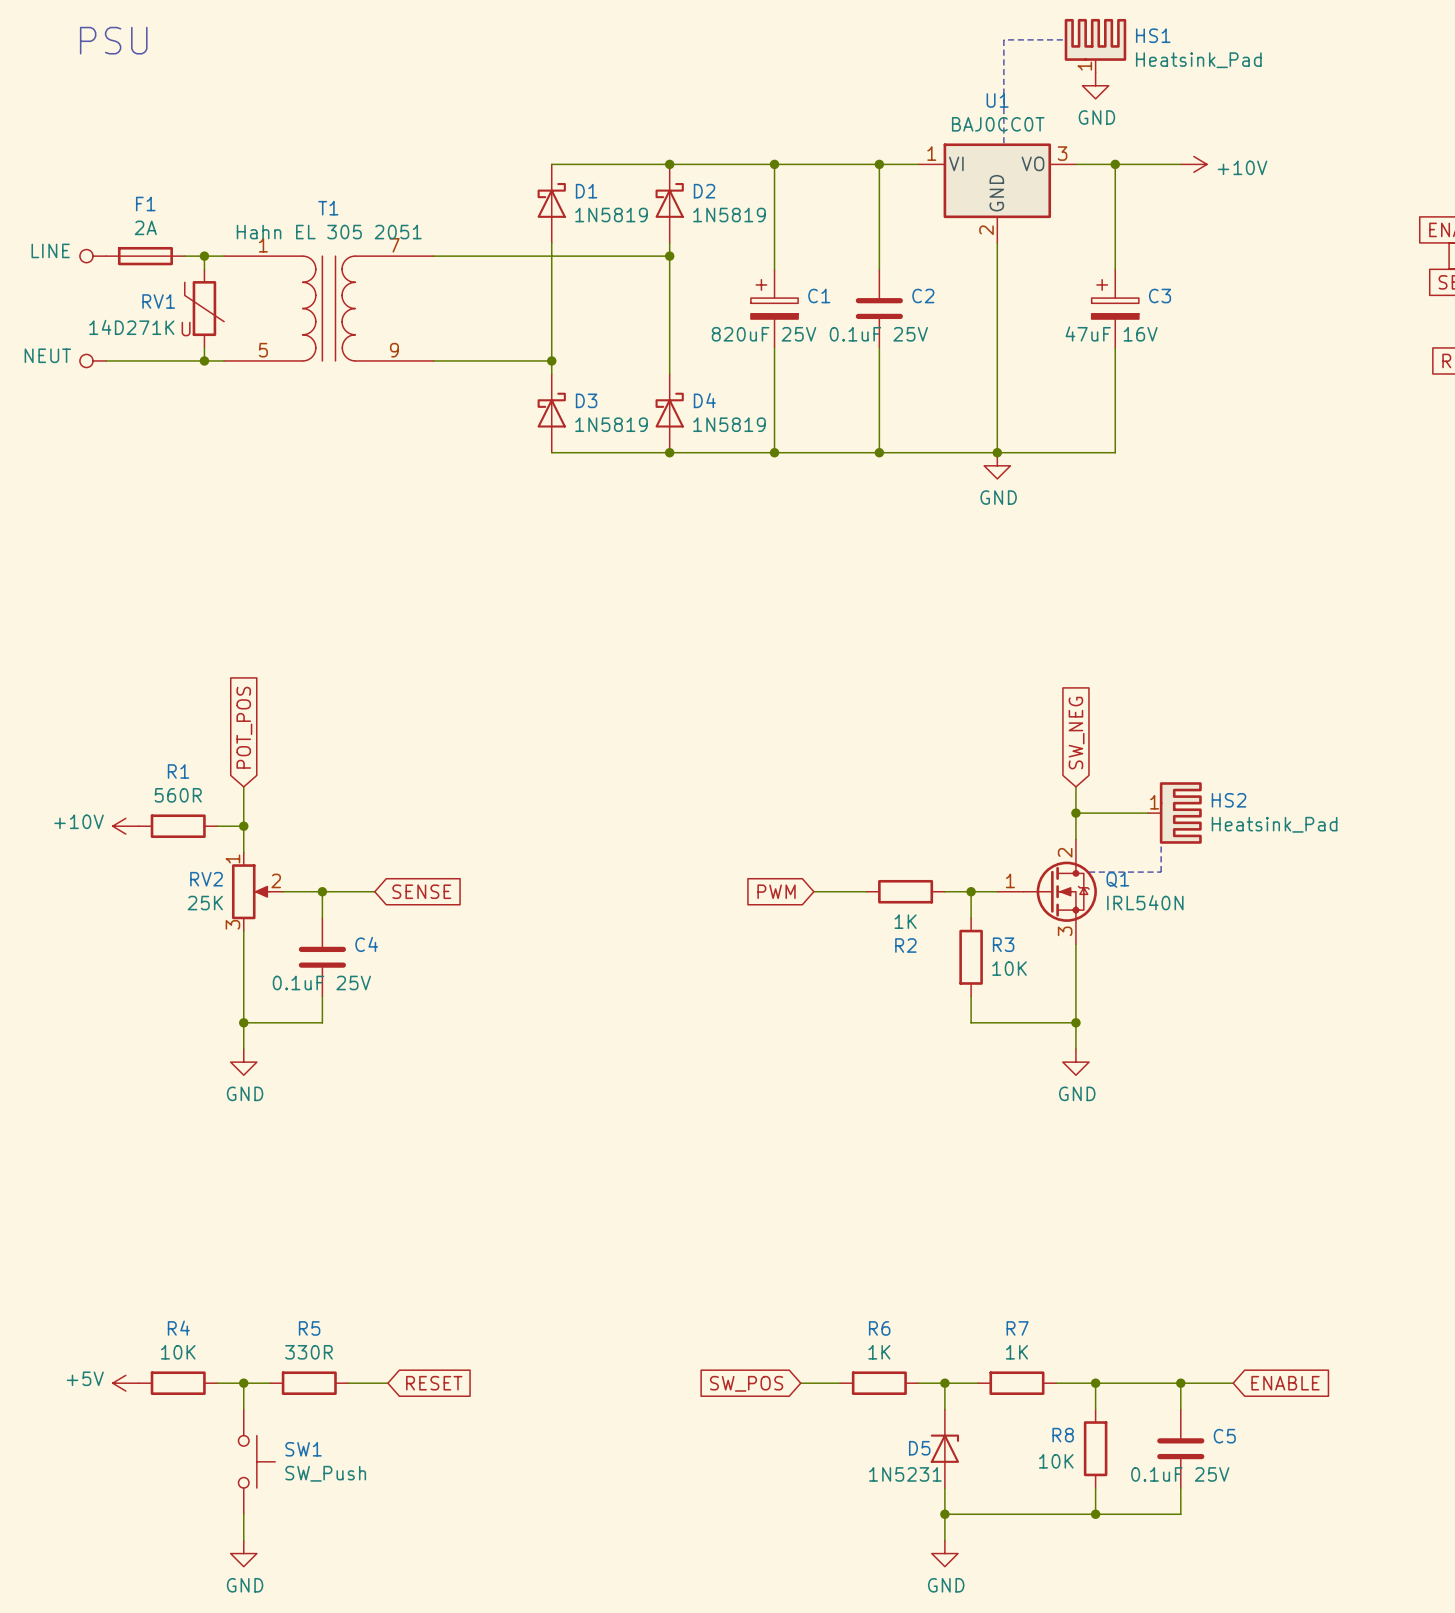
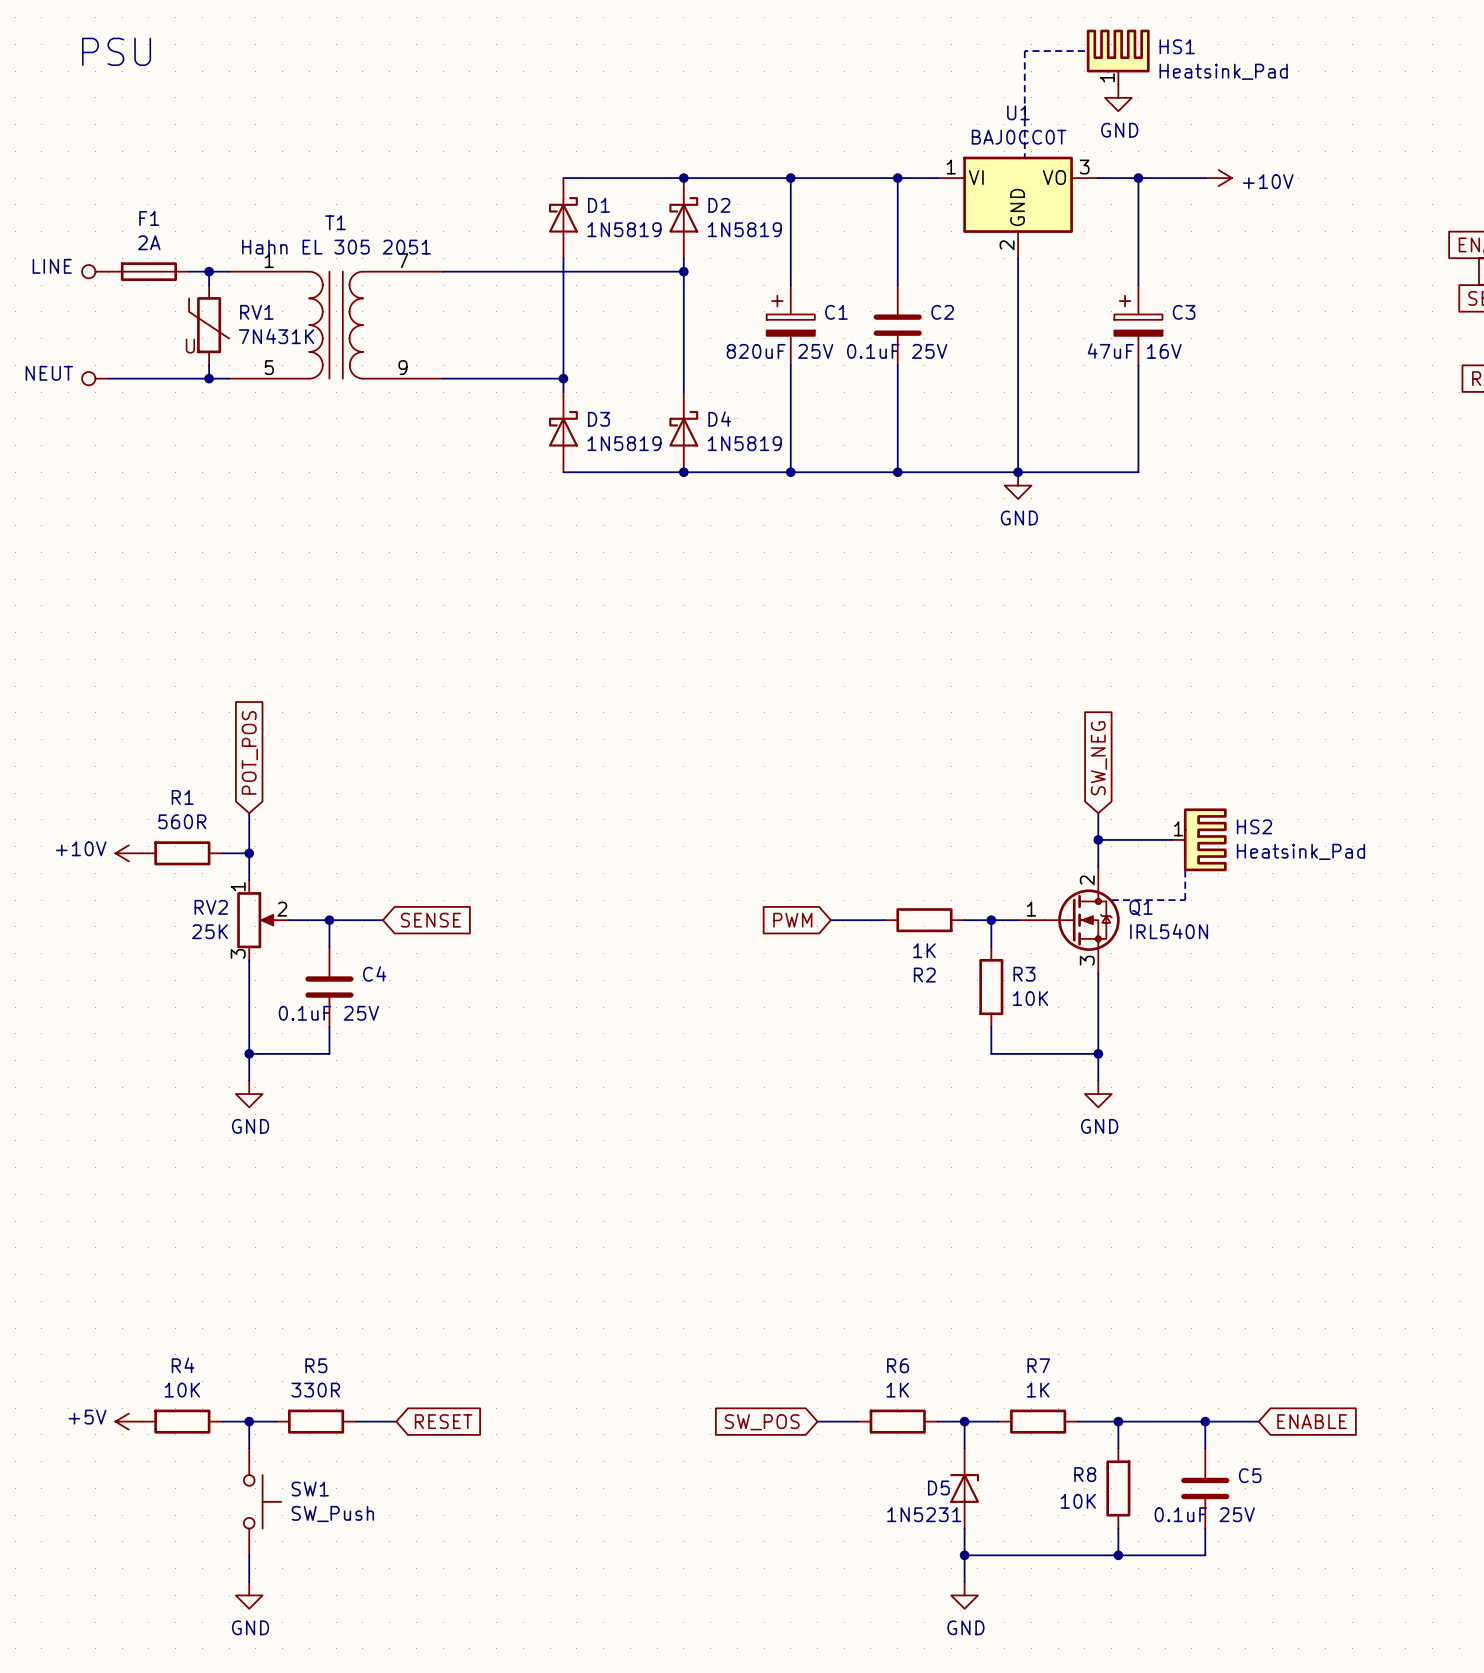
RV1 name position: RV1 (158, 301) -> RV1 (256, 312)
RV1 value: 14D271K (131, 327) -> 7N431K (276, 336)

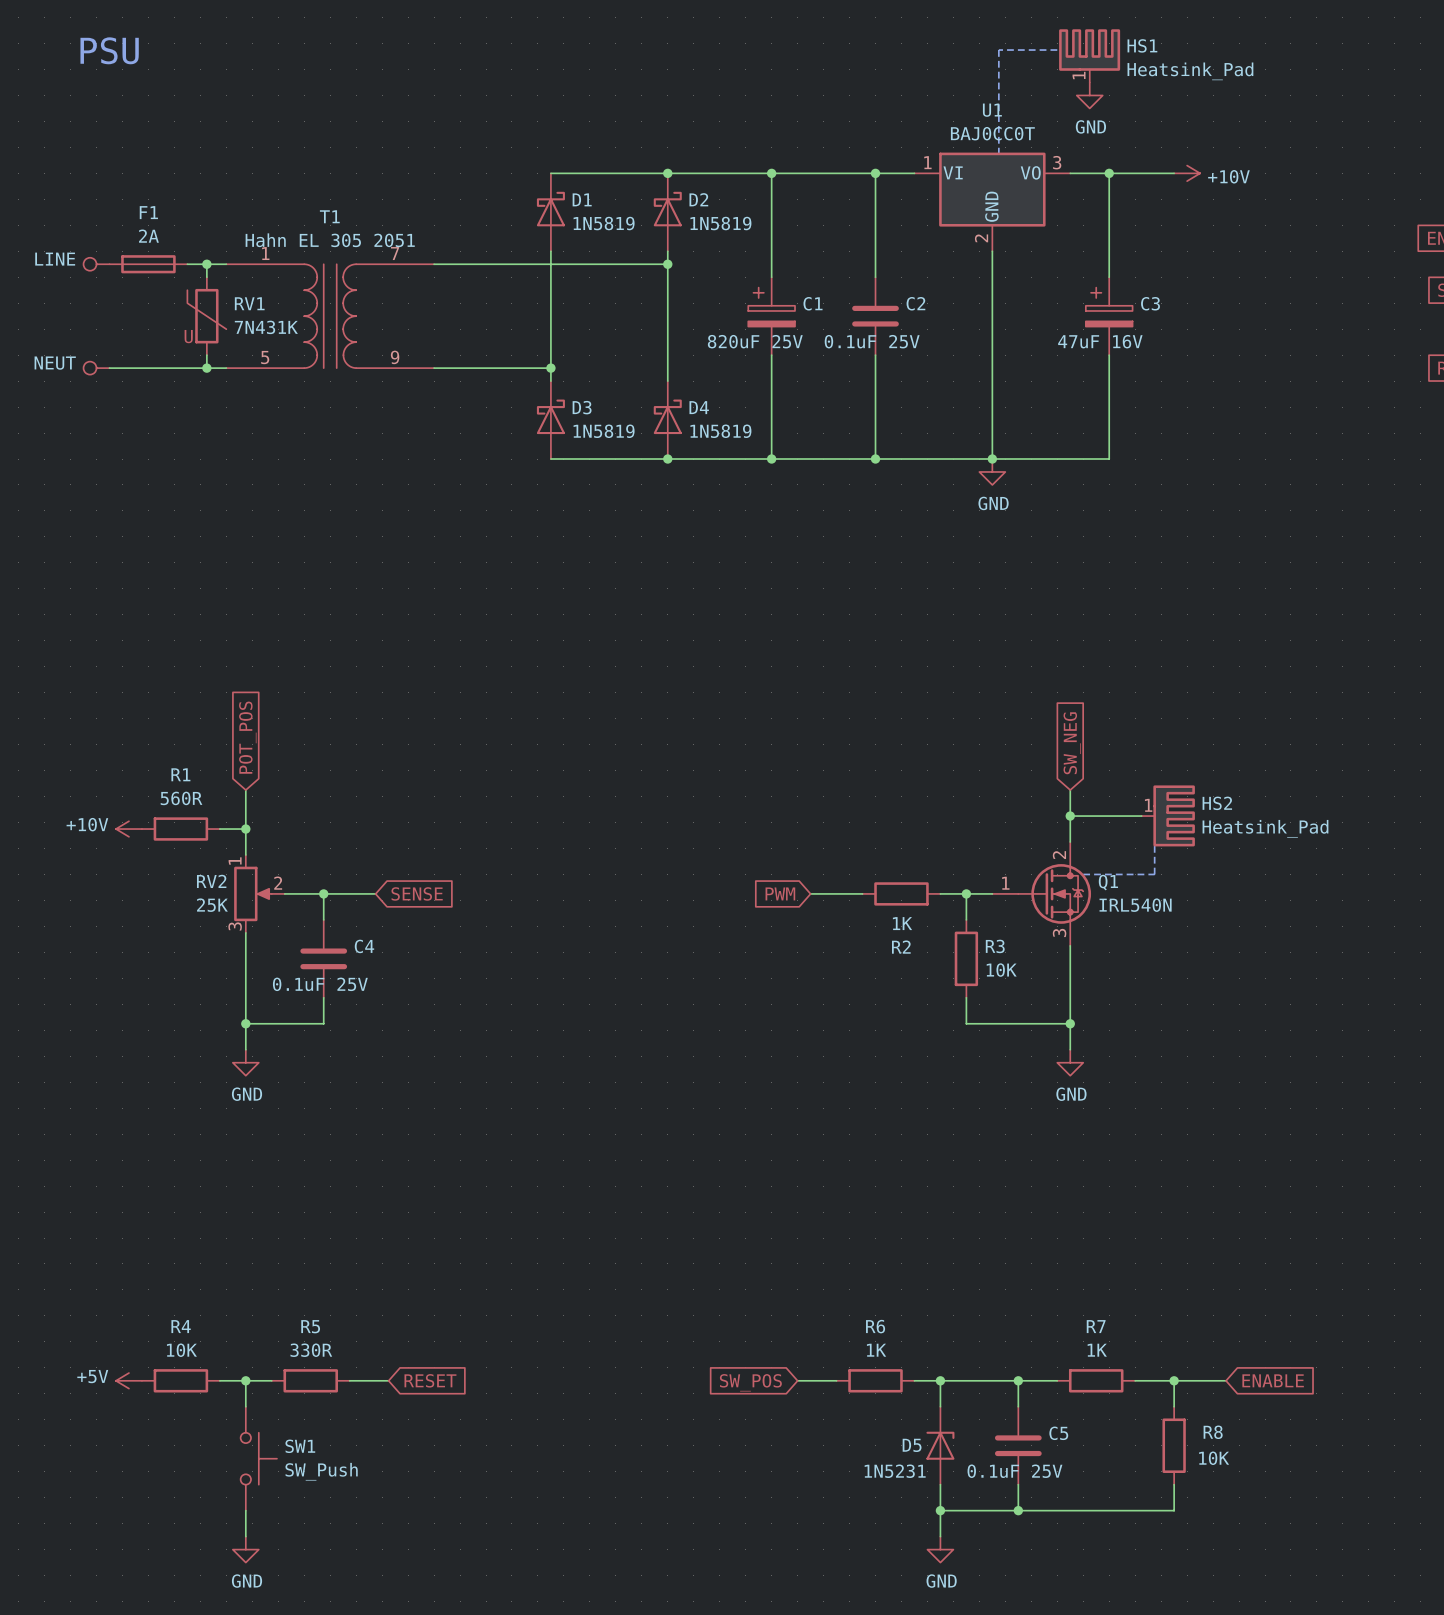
R7 position: (1038, 1421) -> (1096, 1380)
junction: none -> (1018, 1380)
wire: (1084, 1421) (1165, 1421) -> (972, 1380) (1050, 1380)
wire: (1118, 1421) (1118, 1448) -> (1018, 1380) (1018, 1406)
junction: (1118, 1421) -> none
R8 name position: R8 (1085, 1474) -> R8 (1213, 1432)
R8 position: (1118, 1488) -> (1174, 1445)
C5 position: (1205, 1488) -> (1018, 1445)
R8 value position: 10K (1078, 1501) -> 10K (1214, 1458)
wire: (1118, 1528) (1118, 1555) -> (1018, 1484) (1018, 1510)
junction: none -> (1018, 1510)
junction: (1118, 1555) -> none

